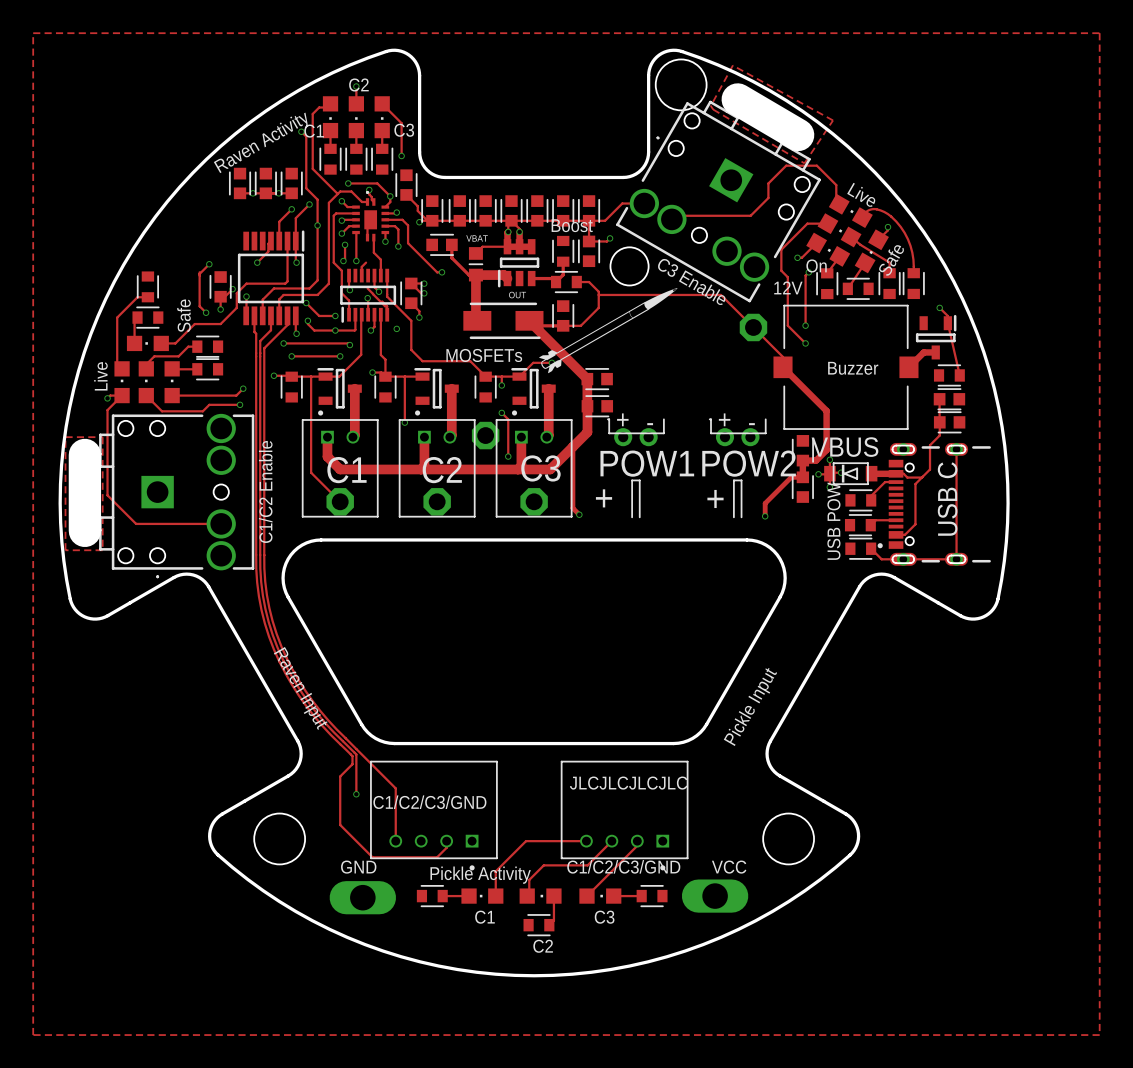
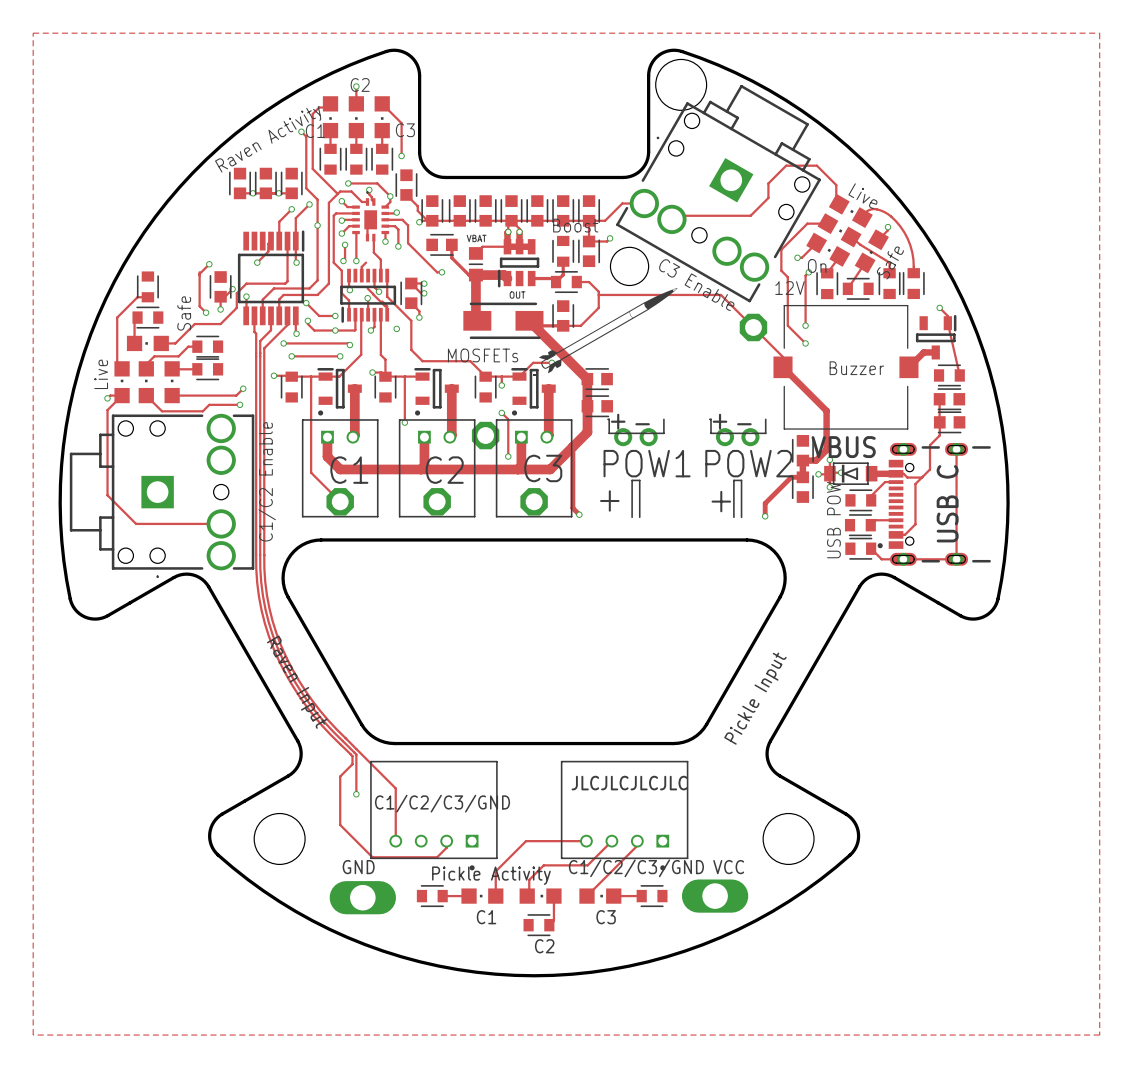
zone outline: (732, 65) (833, 120) (804, 163) (713, 109) (710, 105) (732, 65) -> none
board edge: (737, 99) (798, 134) -> none
zone outline: (65, 437) (102, 437) (102, 550) (65, 550) (65, 437) -> none
board edge: (84, 454) (84, 530) -> none

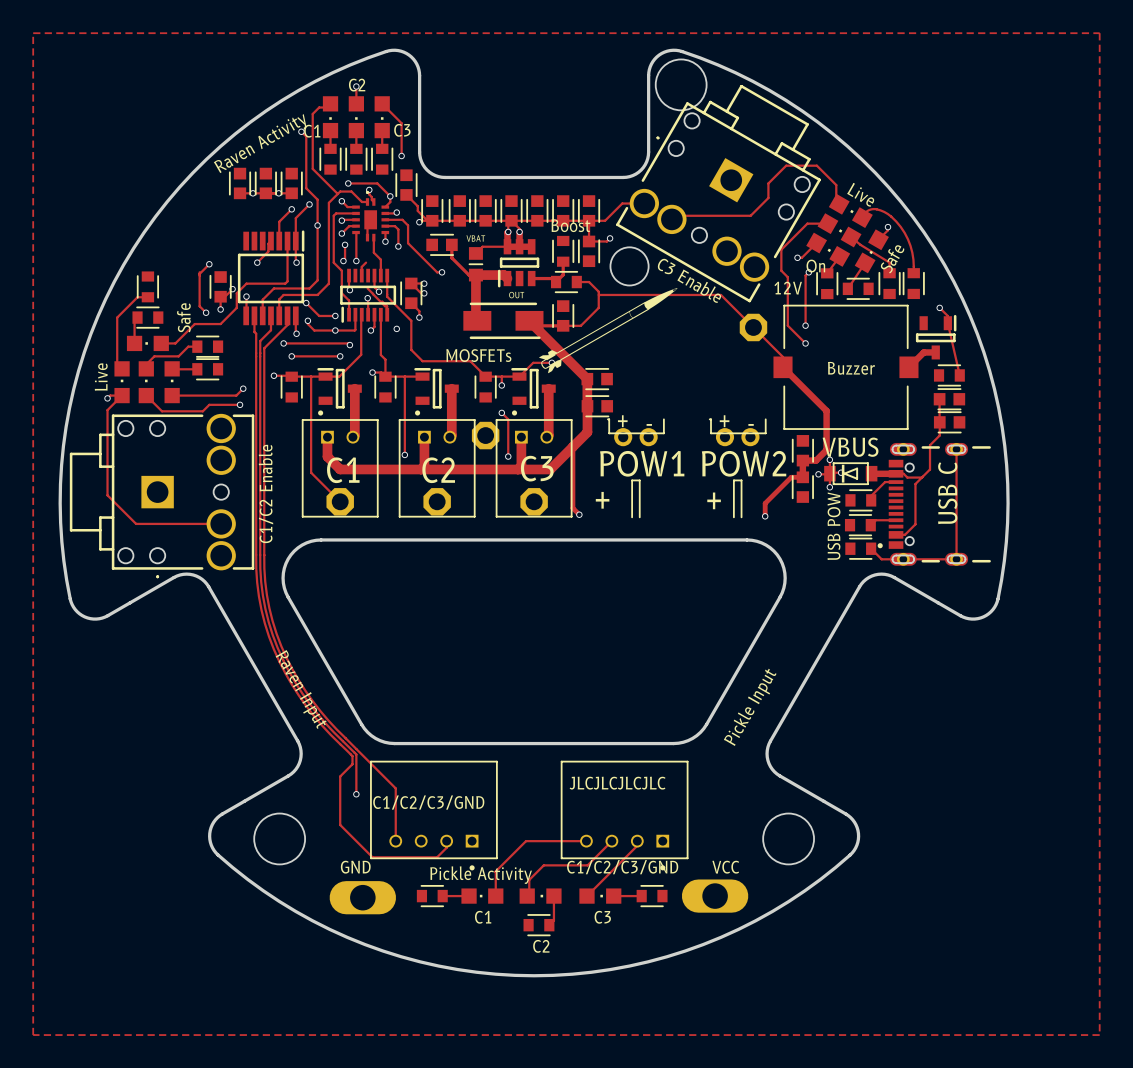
track: none -> (404, 422) (404, 454)
via position: (404, 422) -> (404, 454)

